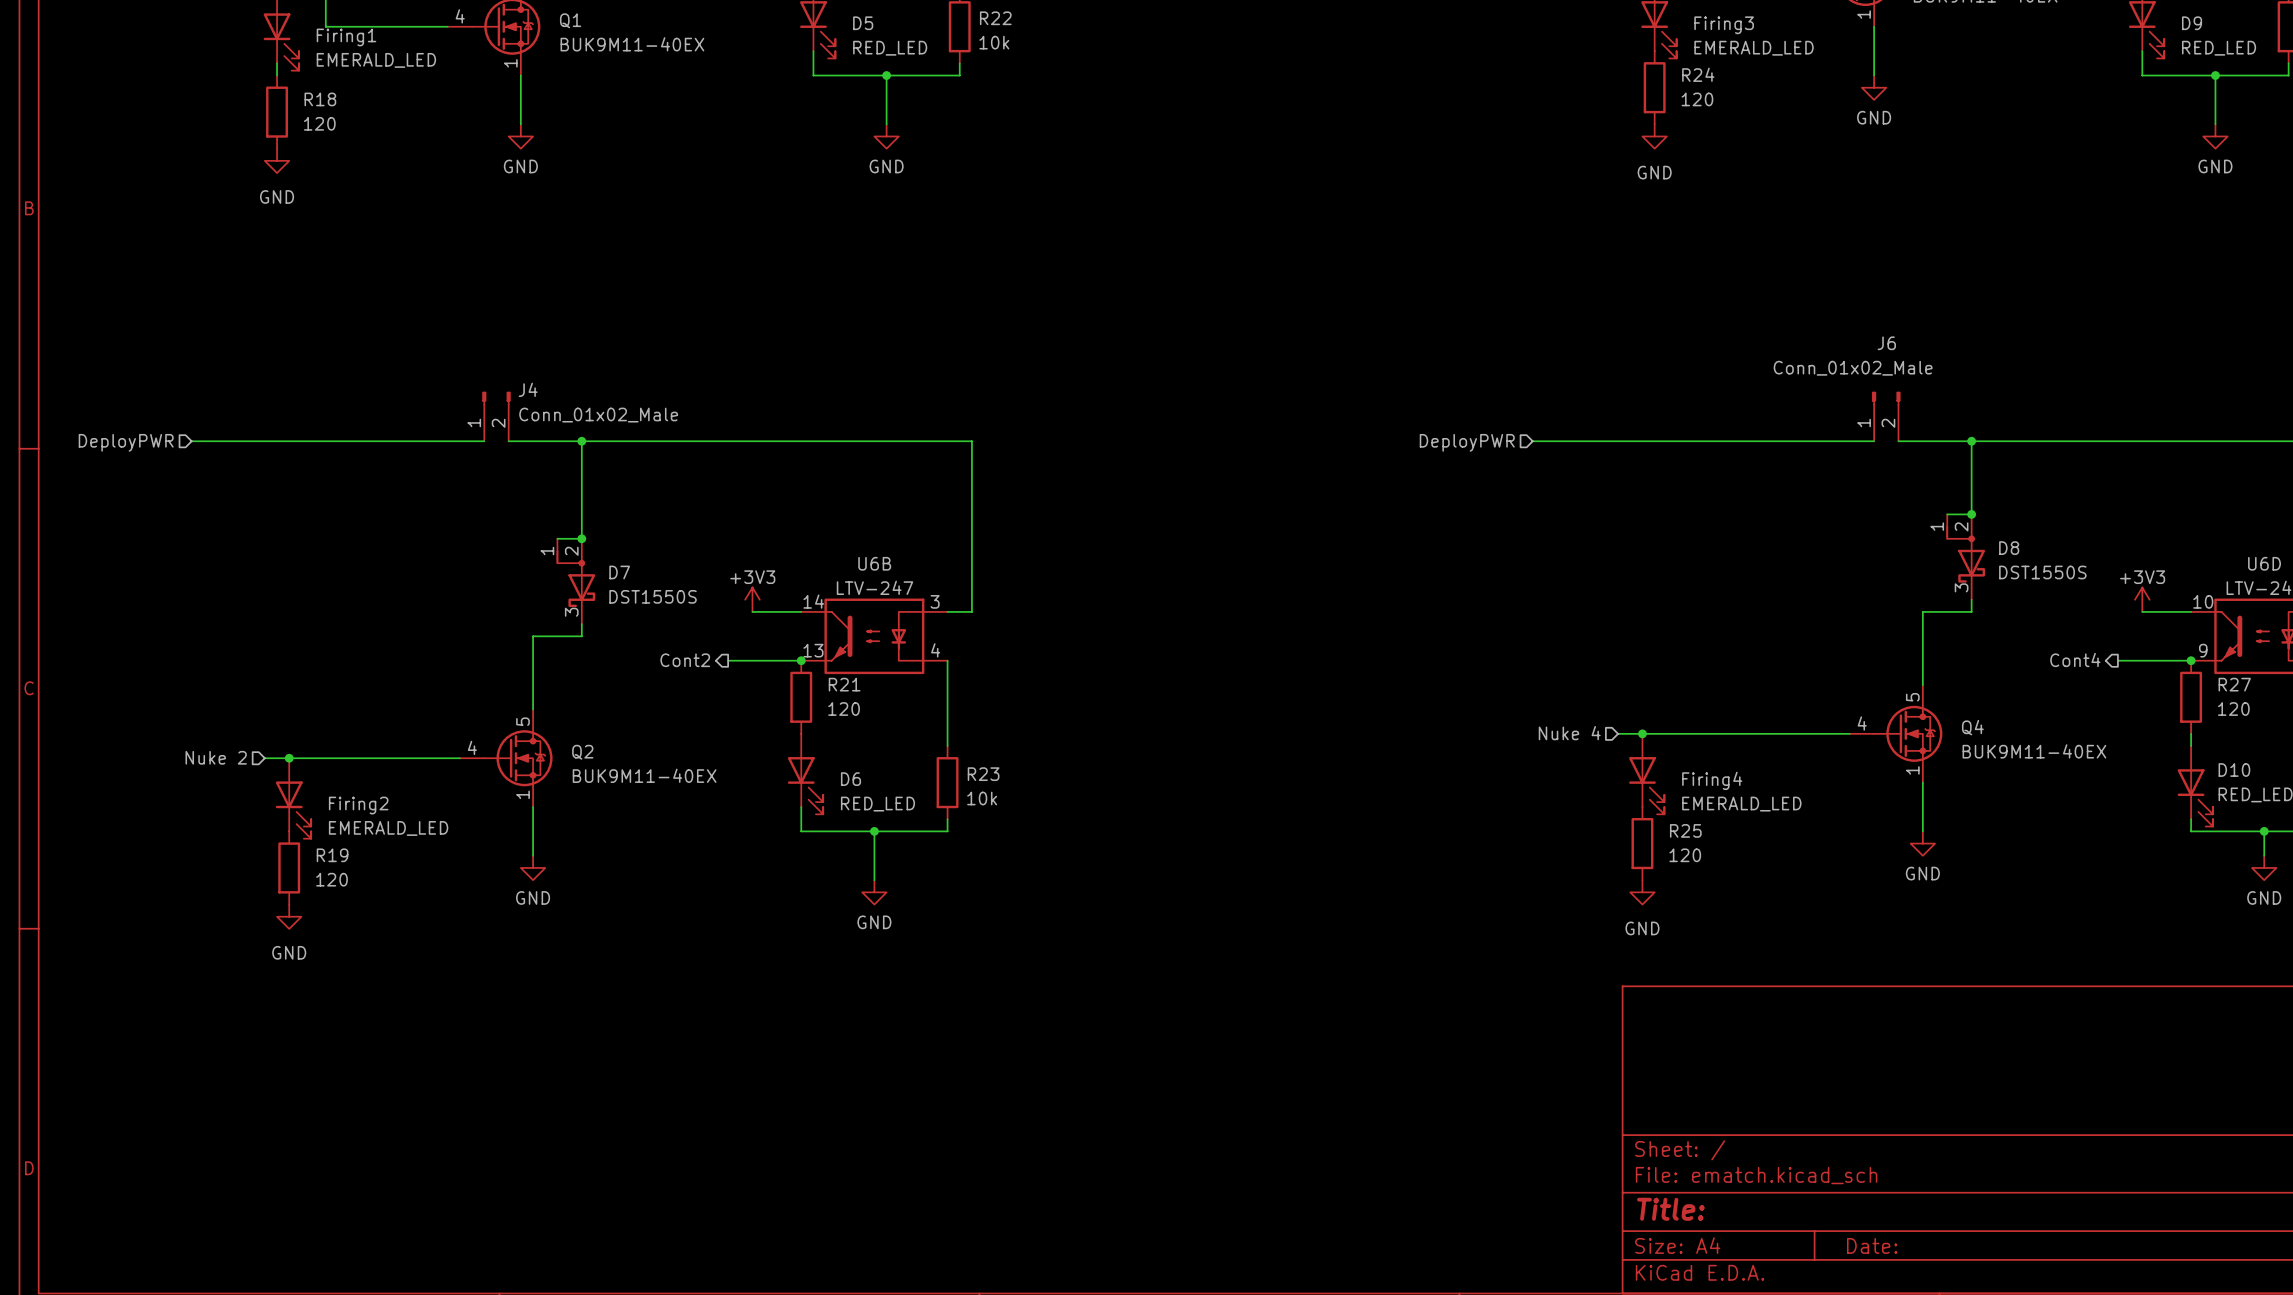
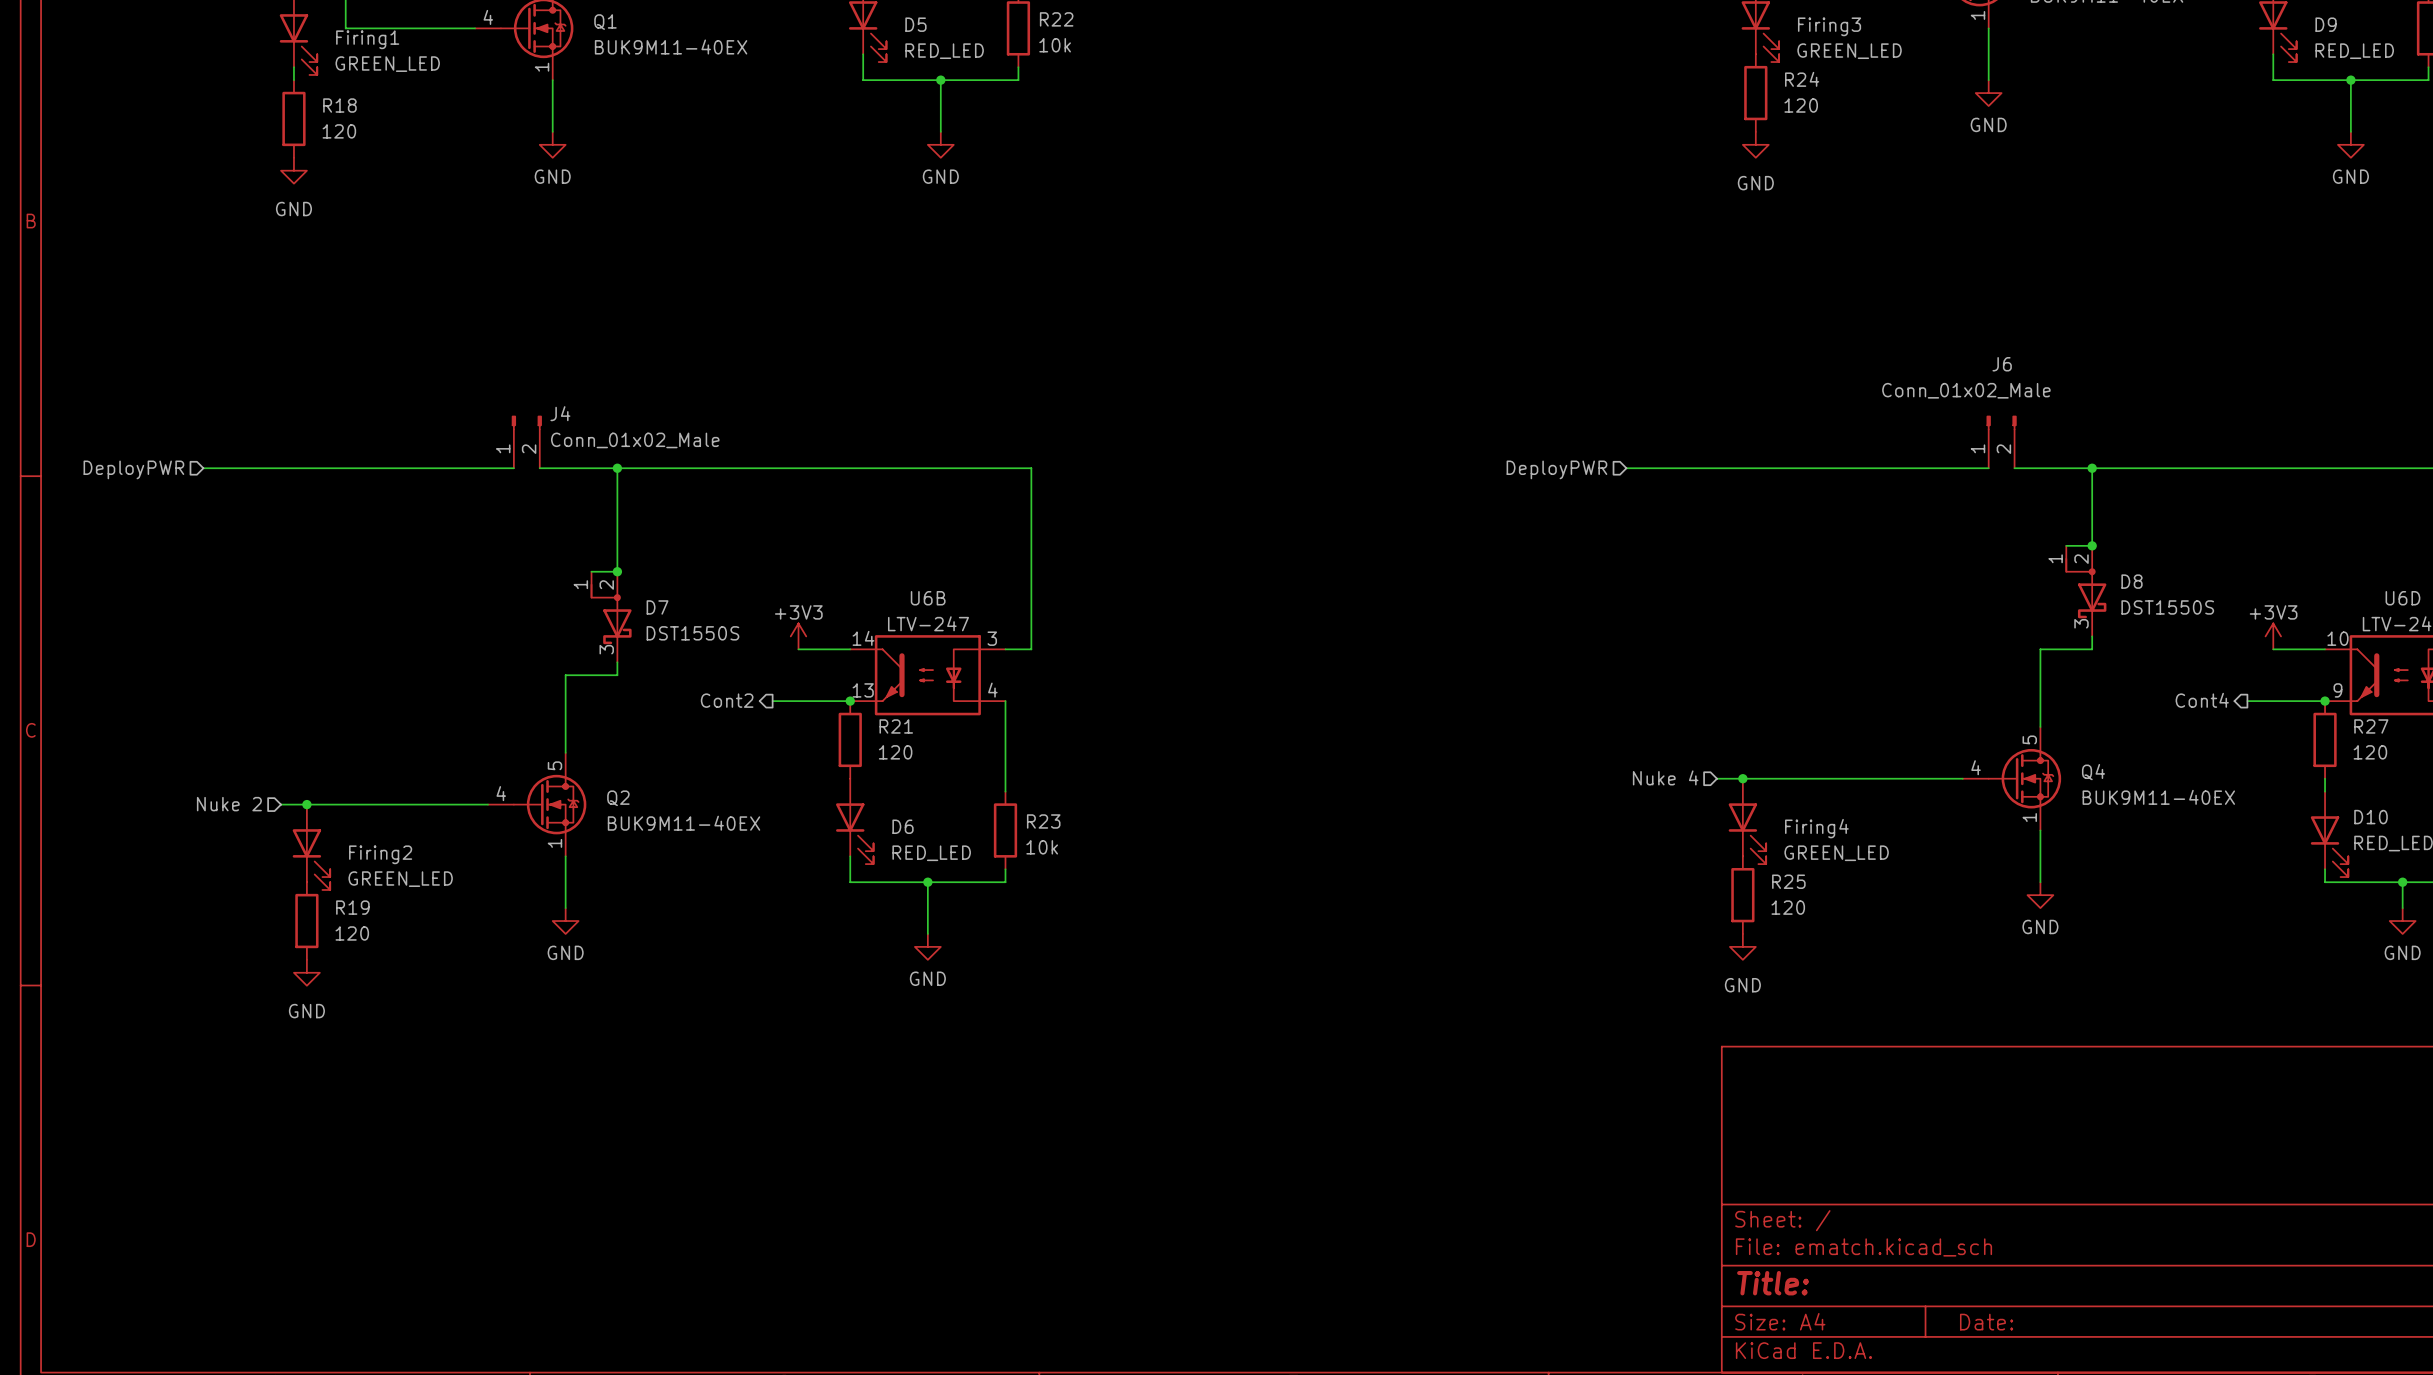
Firing3 value: EMERALD_LED (1754, 48) -> GREEN_LED (1849, 51)
Firing1 value: EMERALD_LED (376, 60) -> GREEN_LED (387, 64)
Firing4 value: EMERALD_LED (1741, 804) -> GREEN_LED (1836, 853)
Firing2 value: EMERALD_LED (388, 828) -> GREEN_LED (400, 879)

